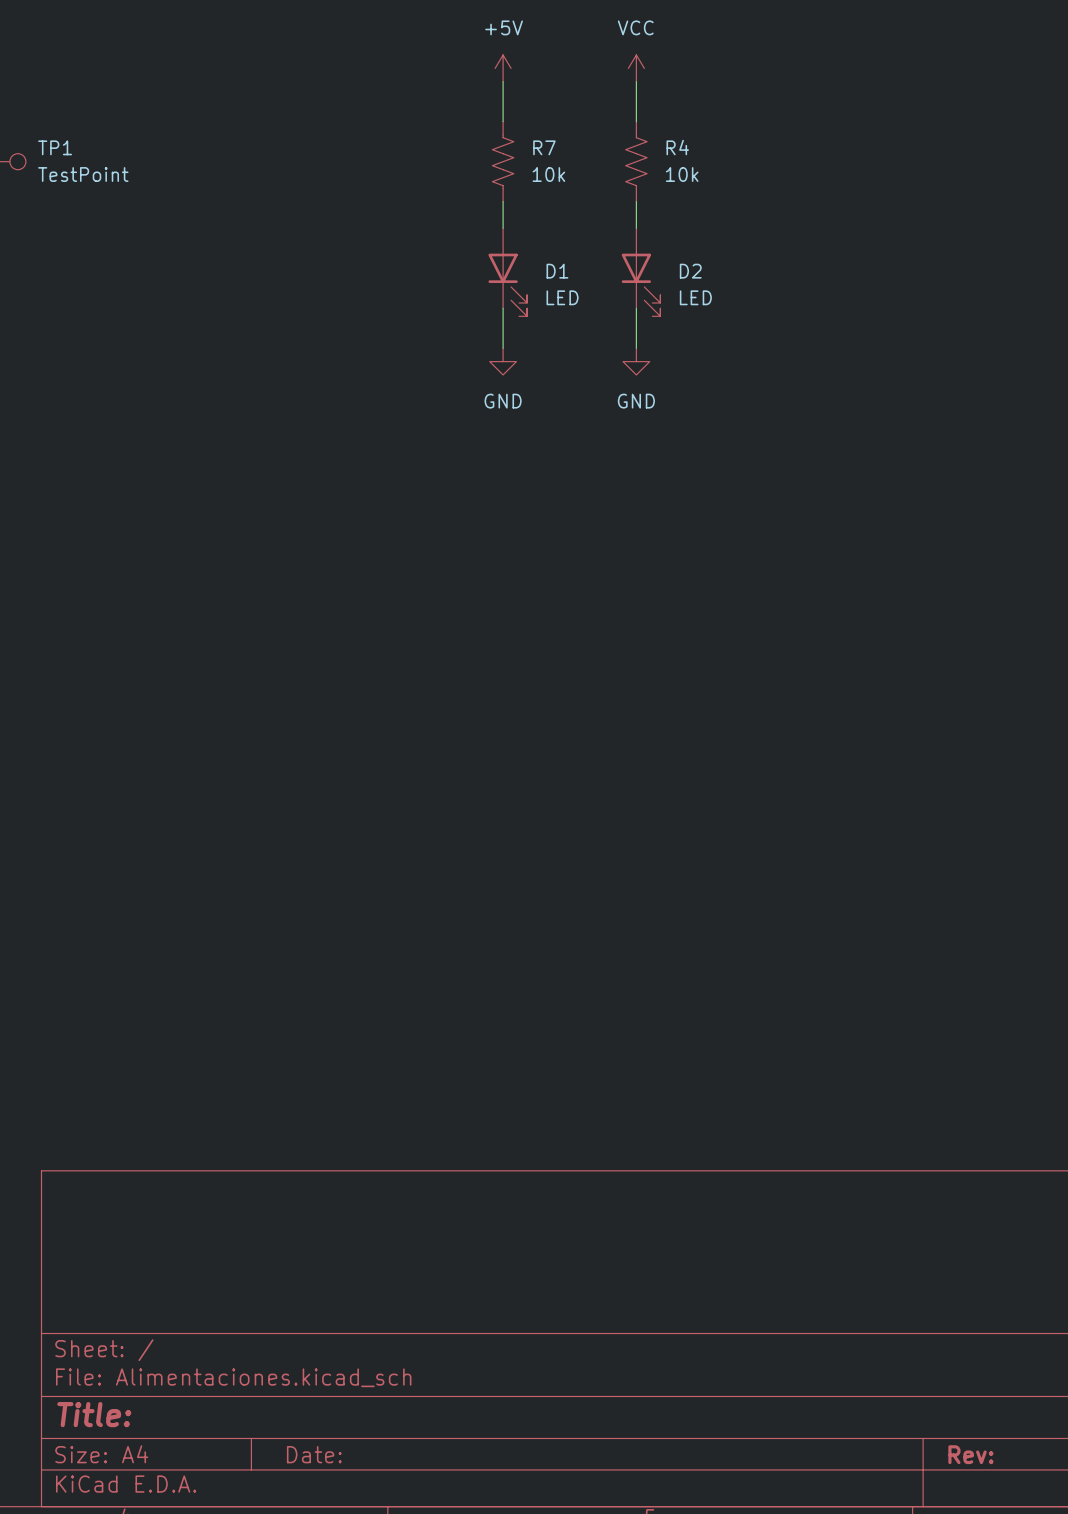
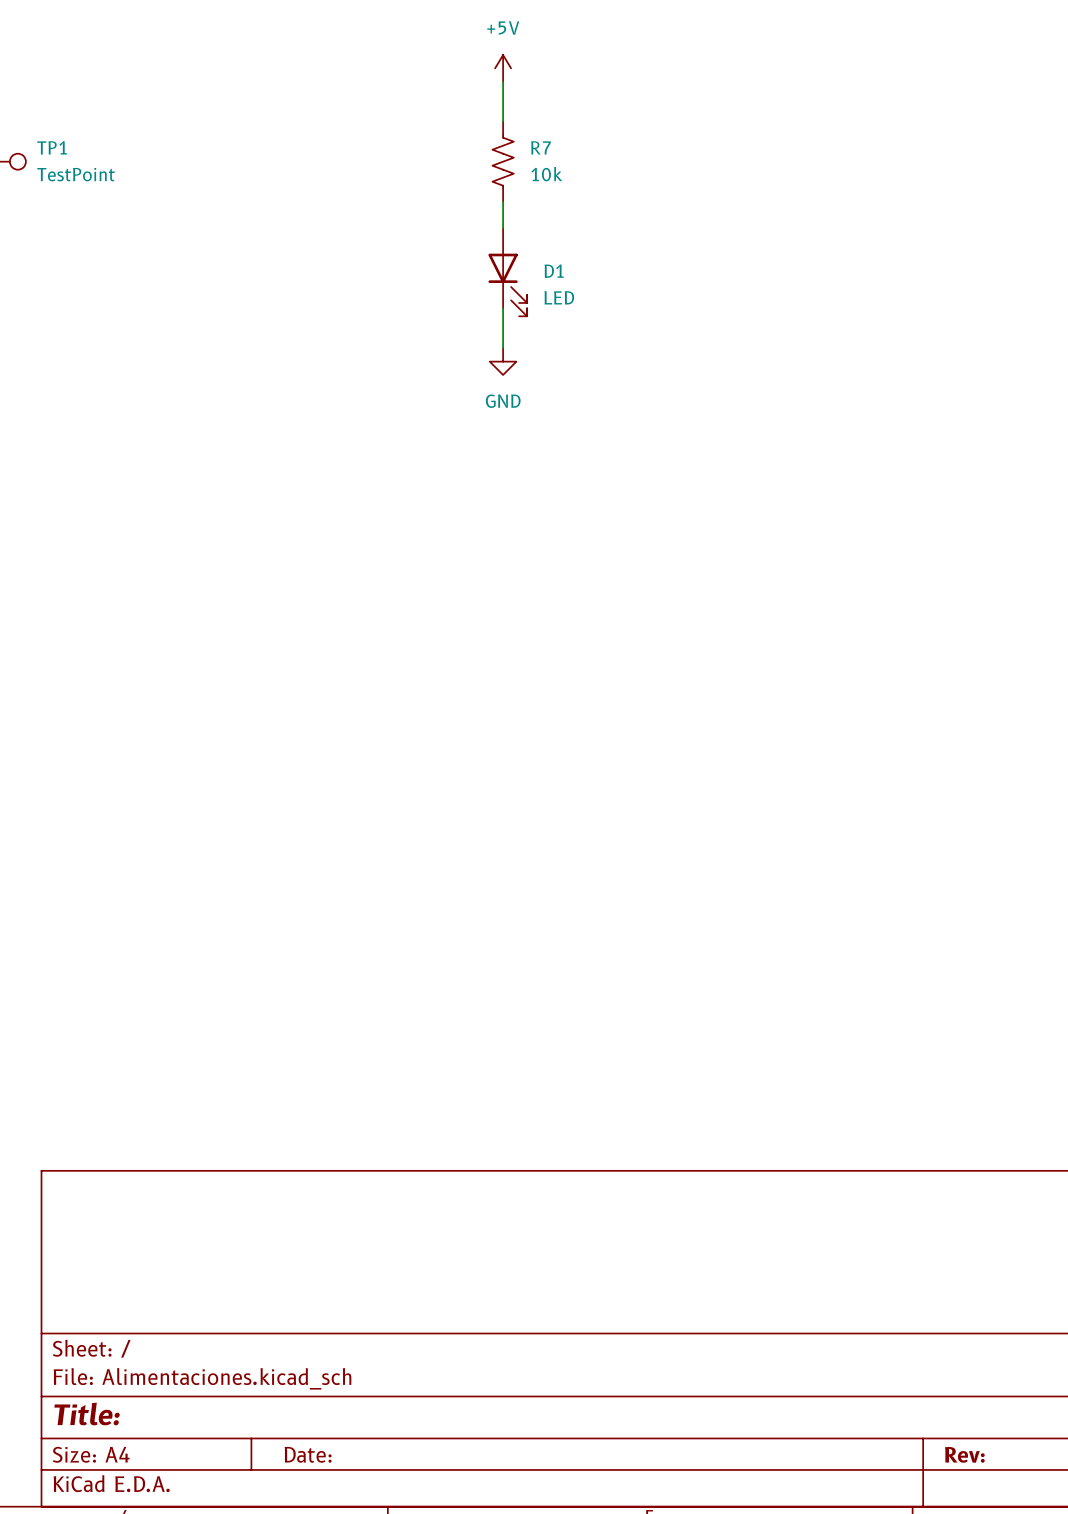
power symbol: VCC (636, 68) -> none
wire: (636, 81) (636, 121) -> none
R4: 10k (636, 161) -> none
wire: (636, 201) (636, 228) -> none
D2: LED (641, 272) -> none
wire: (636, 308) (636, 348) -> none
power symbol: GND (636, 361) -> none

